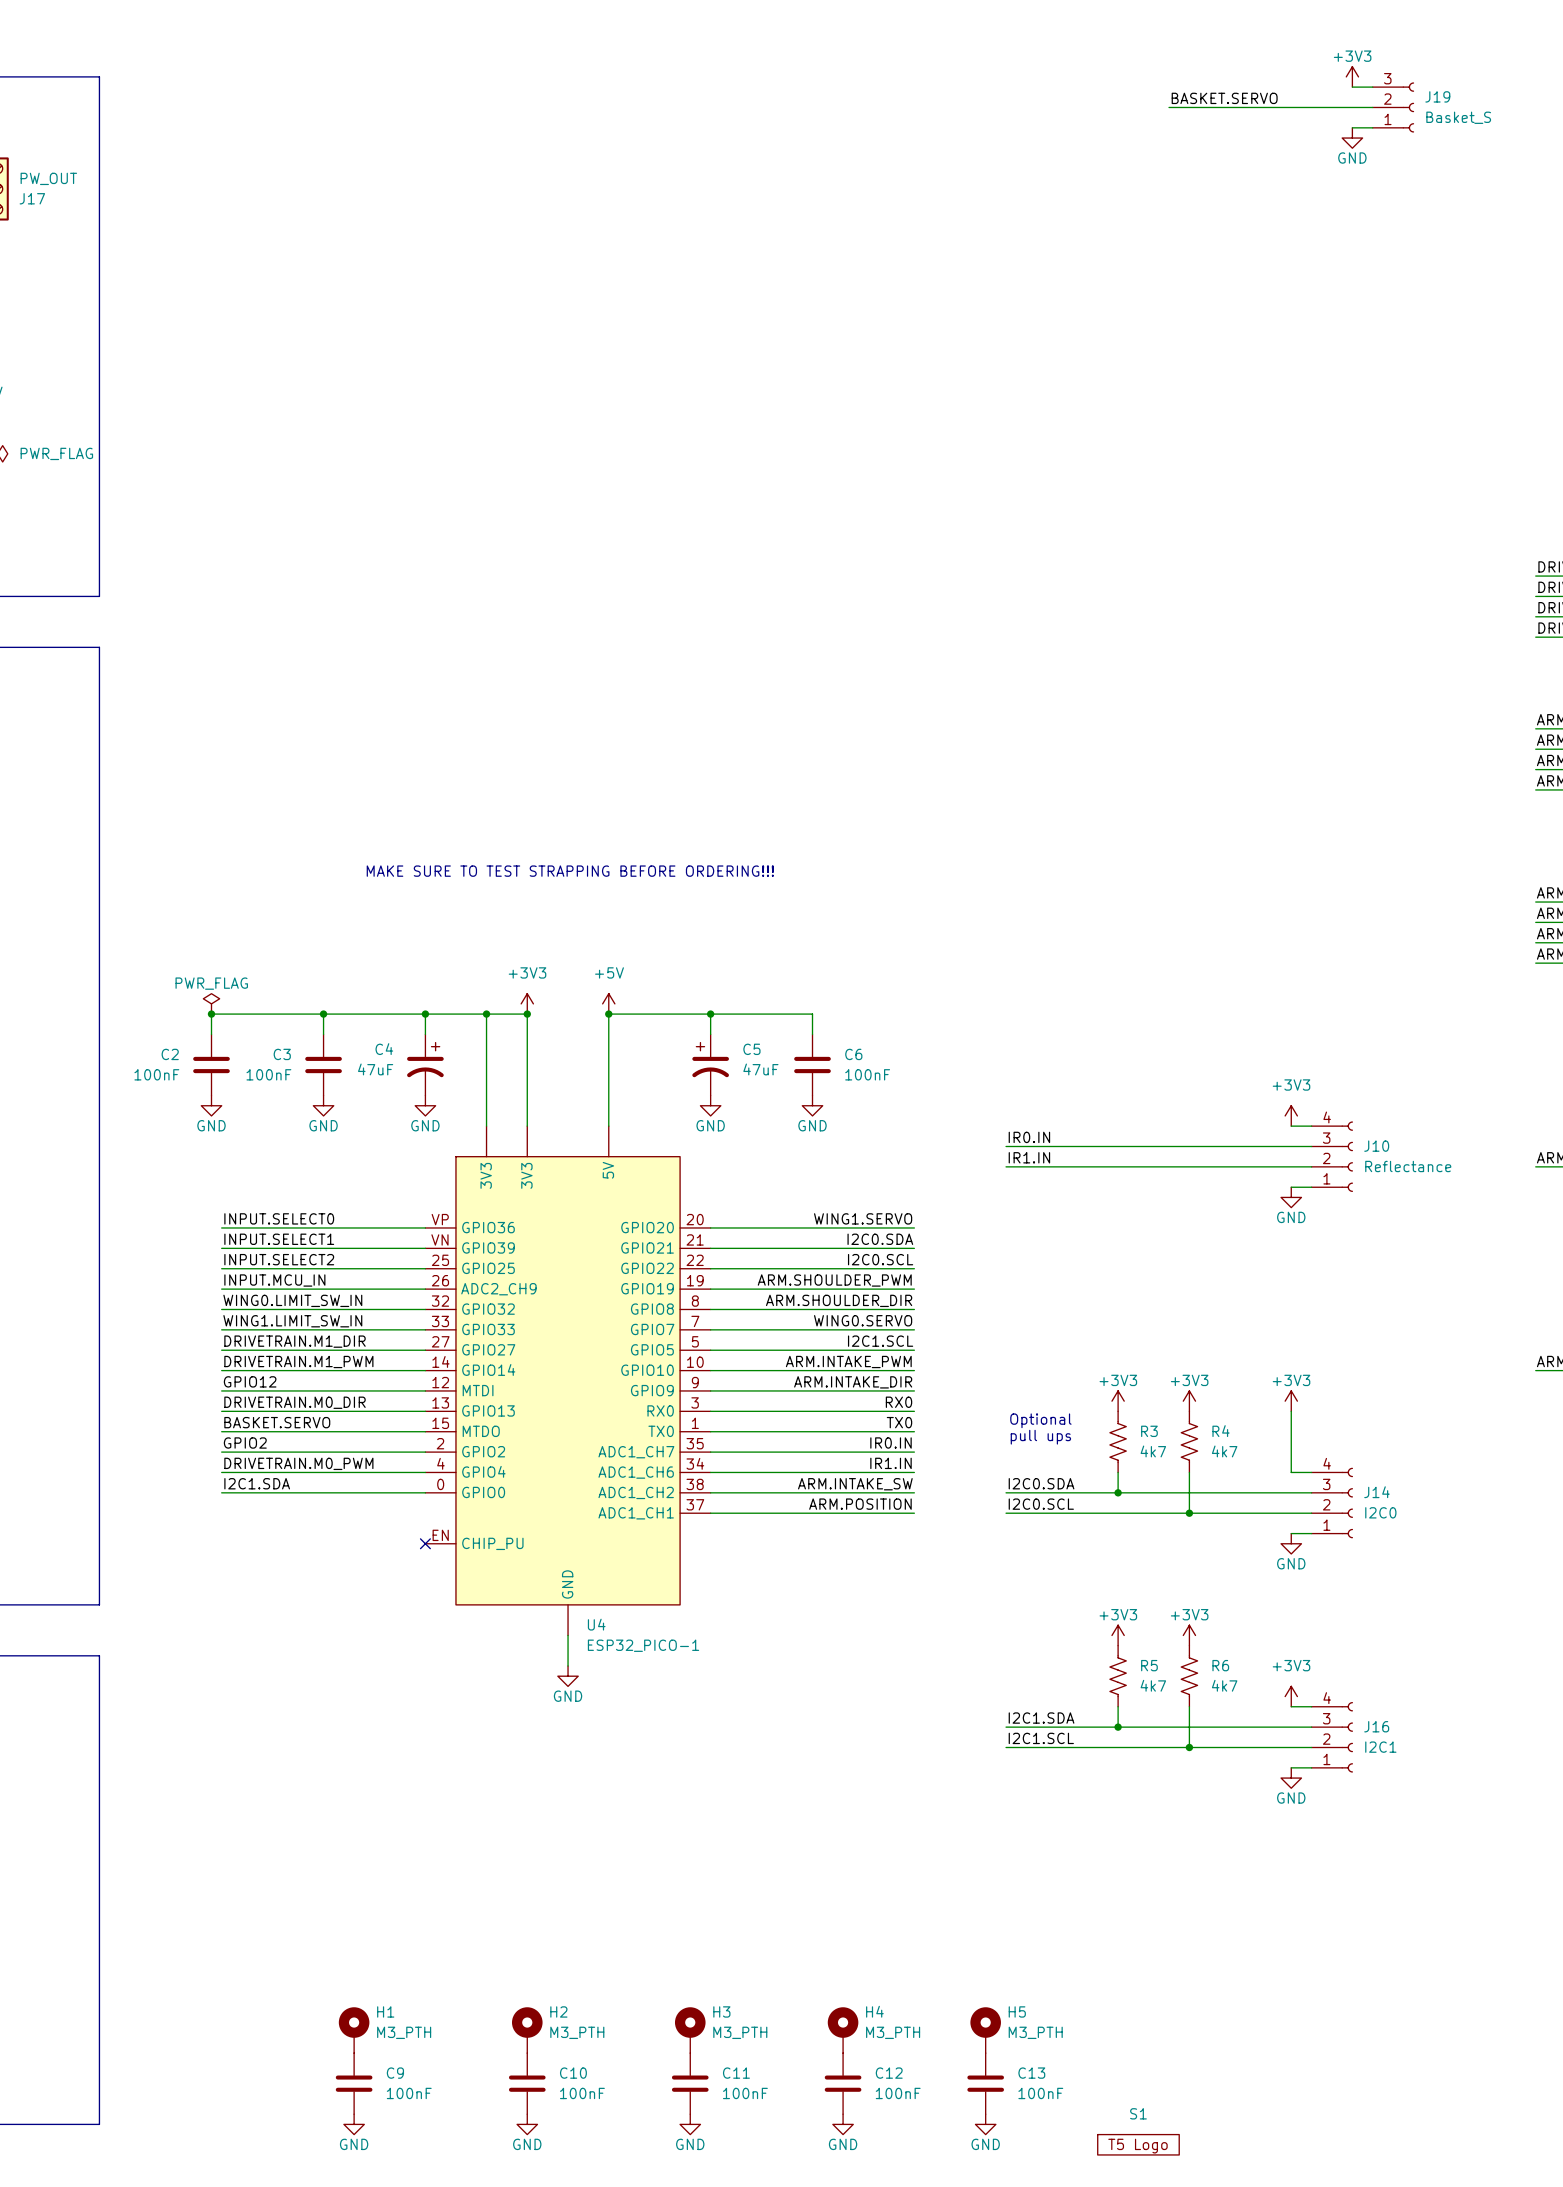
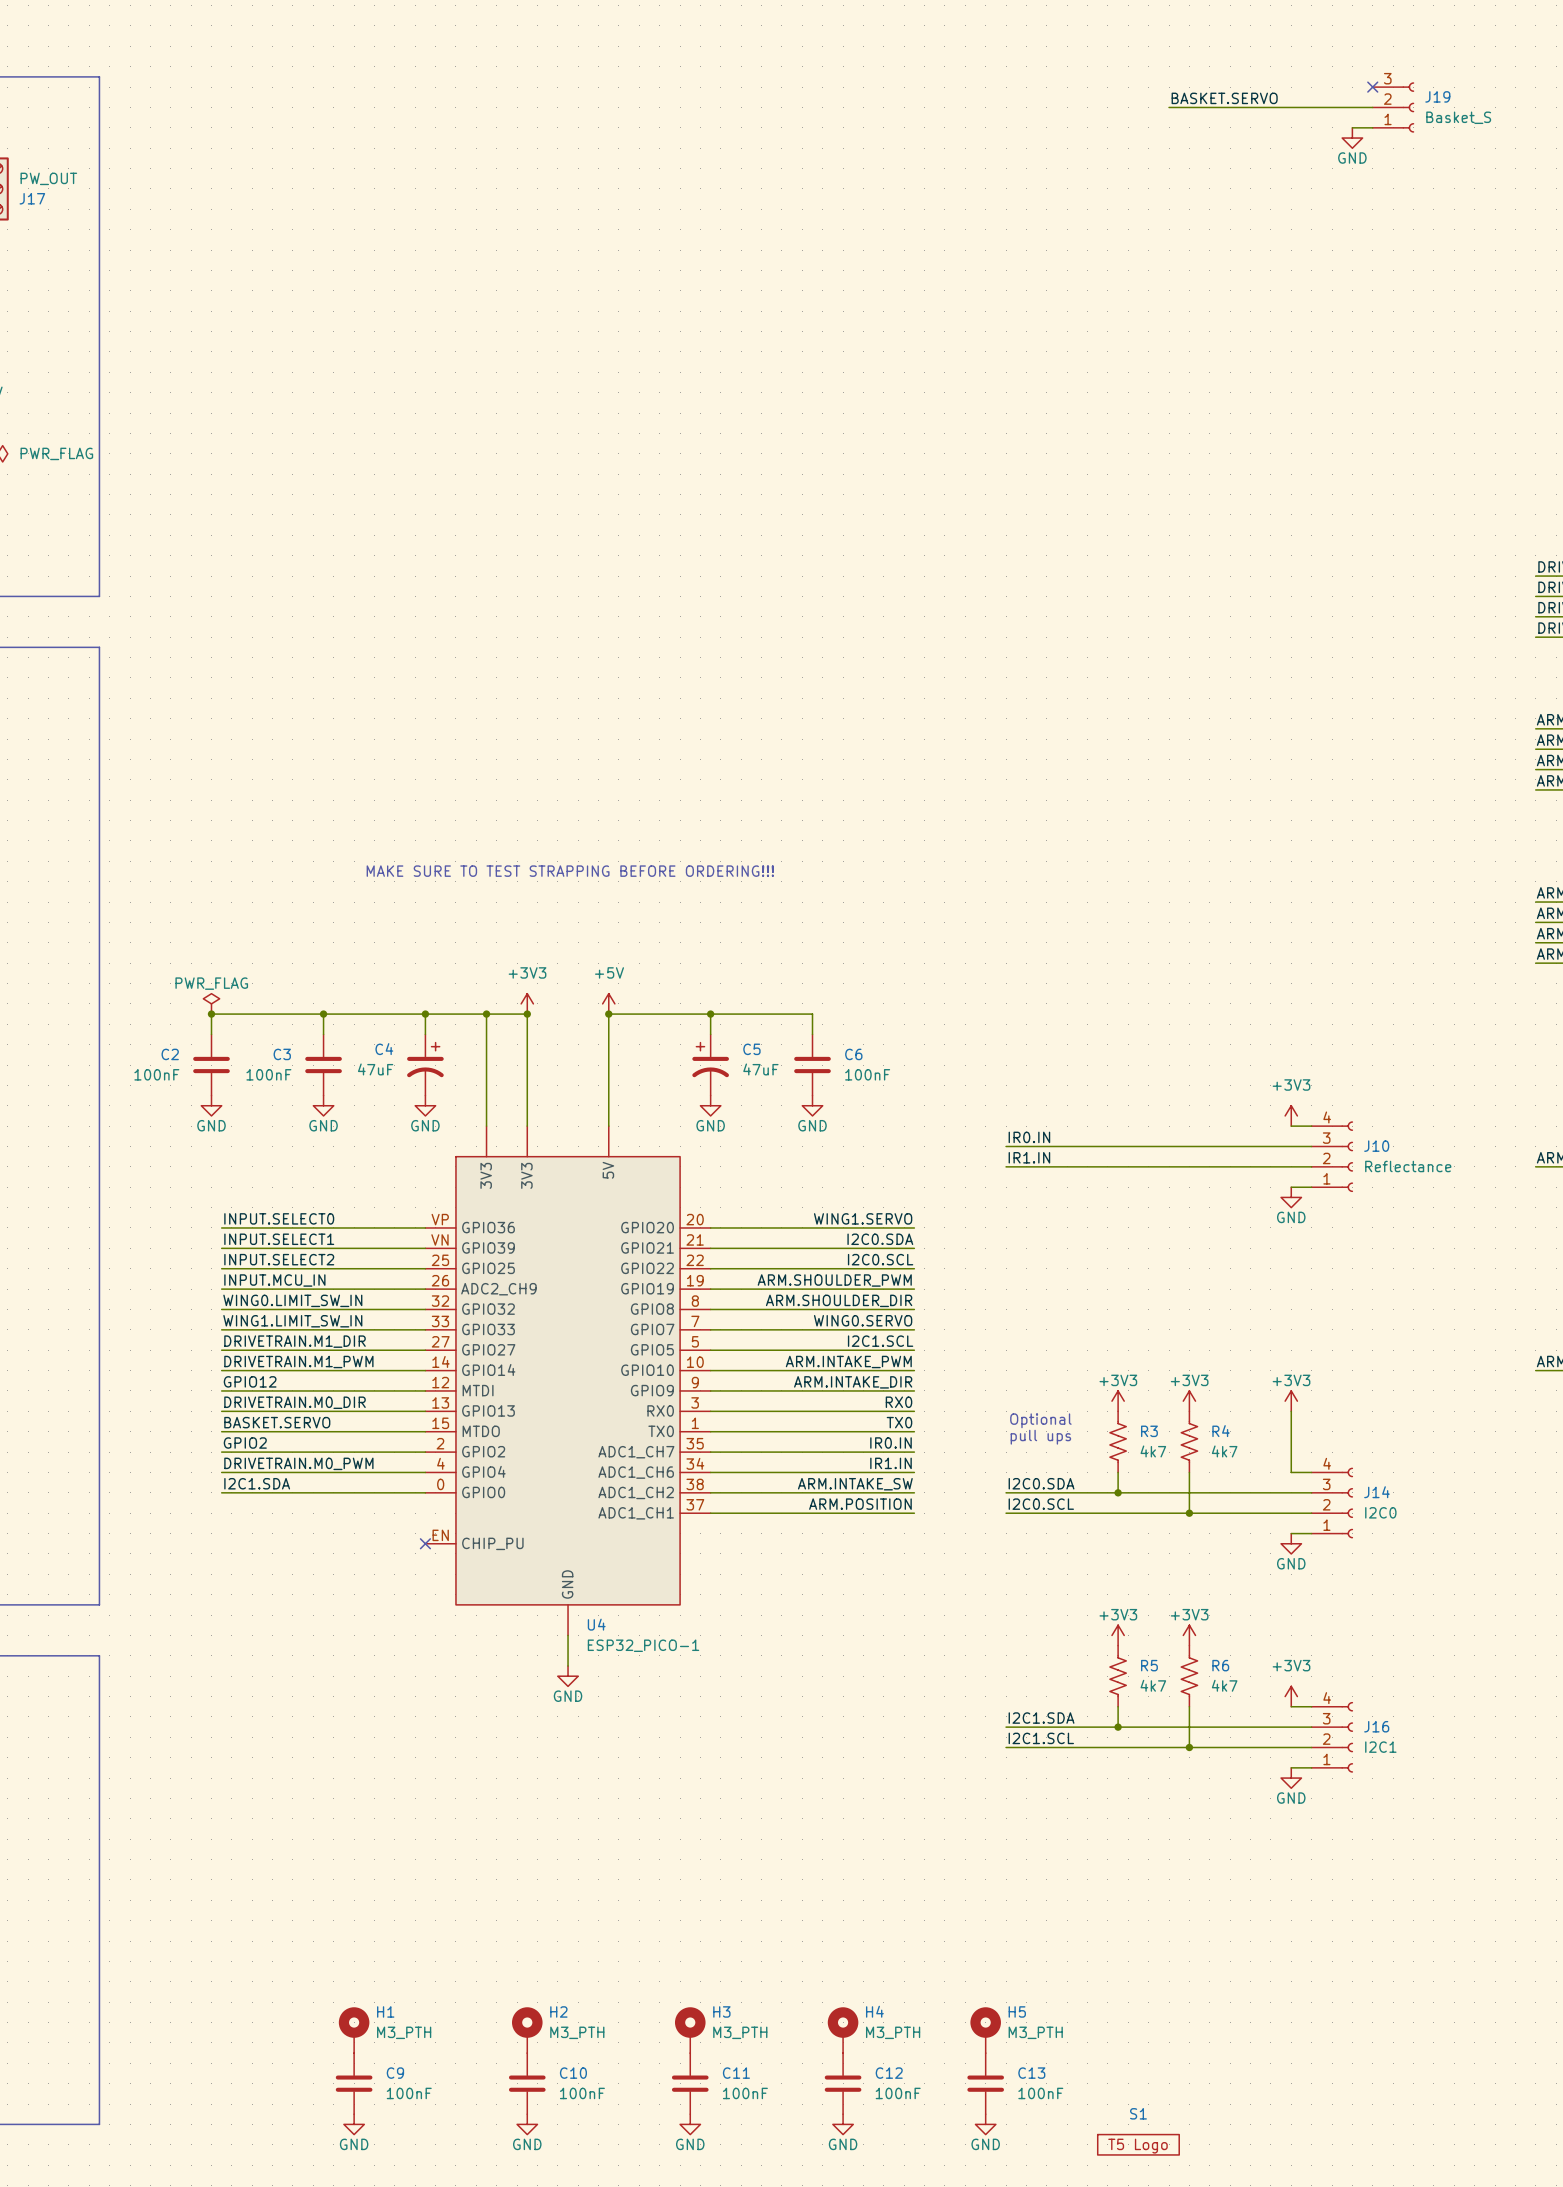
power symbol: +3V3 (1352, 76) -> none
wire: (1352, 87) (1372, 87) -> none
no-connect mark: none -> (1372, 87)

